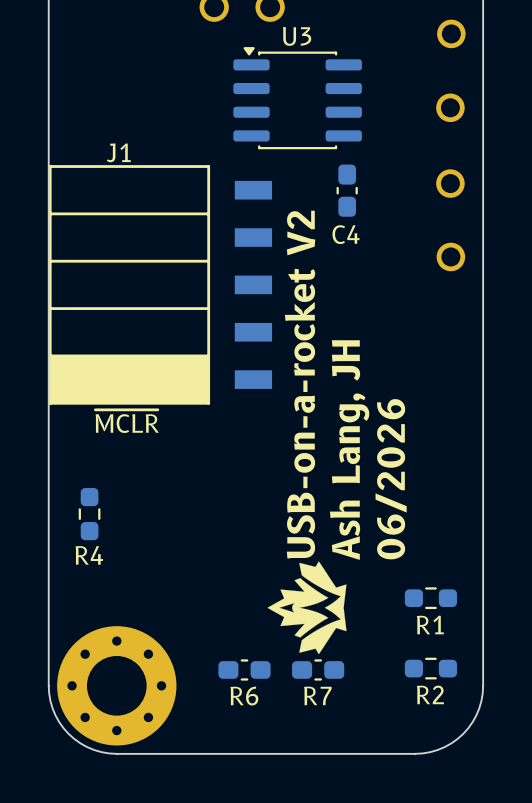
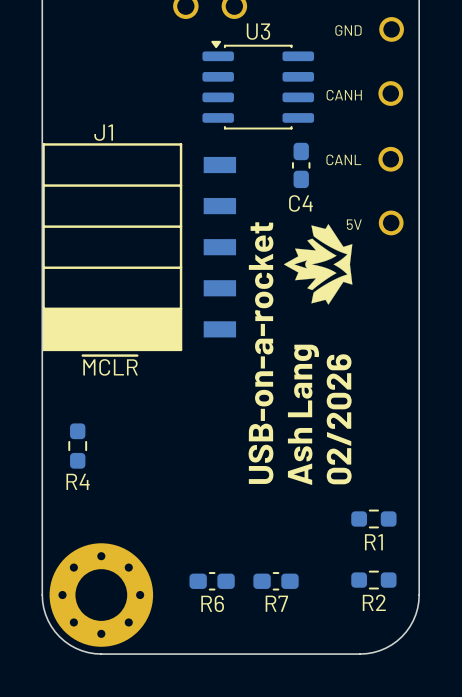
text: none -> GND (348, 30)
text: none -> CANH (344, 95)
text: none -> CANL (343, 159)
text: none -> 5V (354, 224)
text: USB-on-a-rocket V2 (300, 384) -> USB-on-a-rocket (260, 353)
text: Ash Lang, JH (349, 450) -> Ash Lang (303, 414)
text: 06/2026 (391, 479) -> 02/2026 (339, 419)
drawing position: (307, 607) -> (318, 264)

